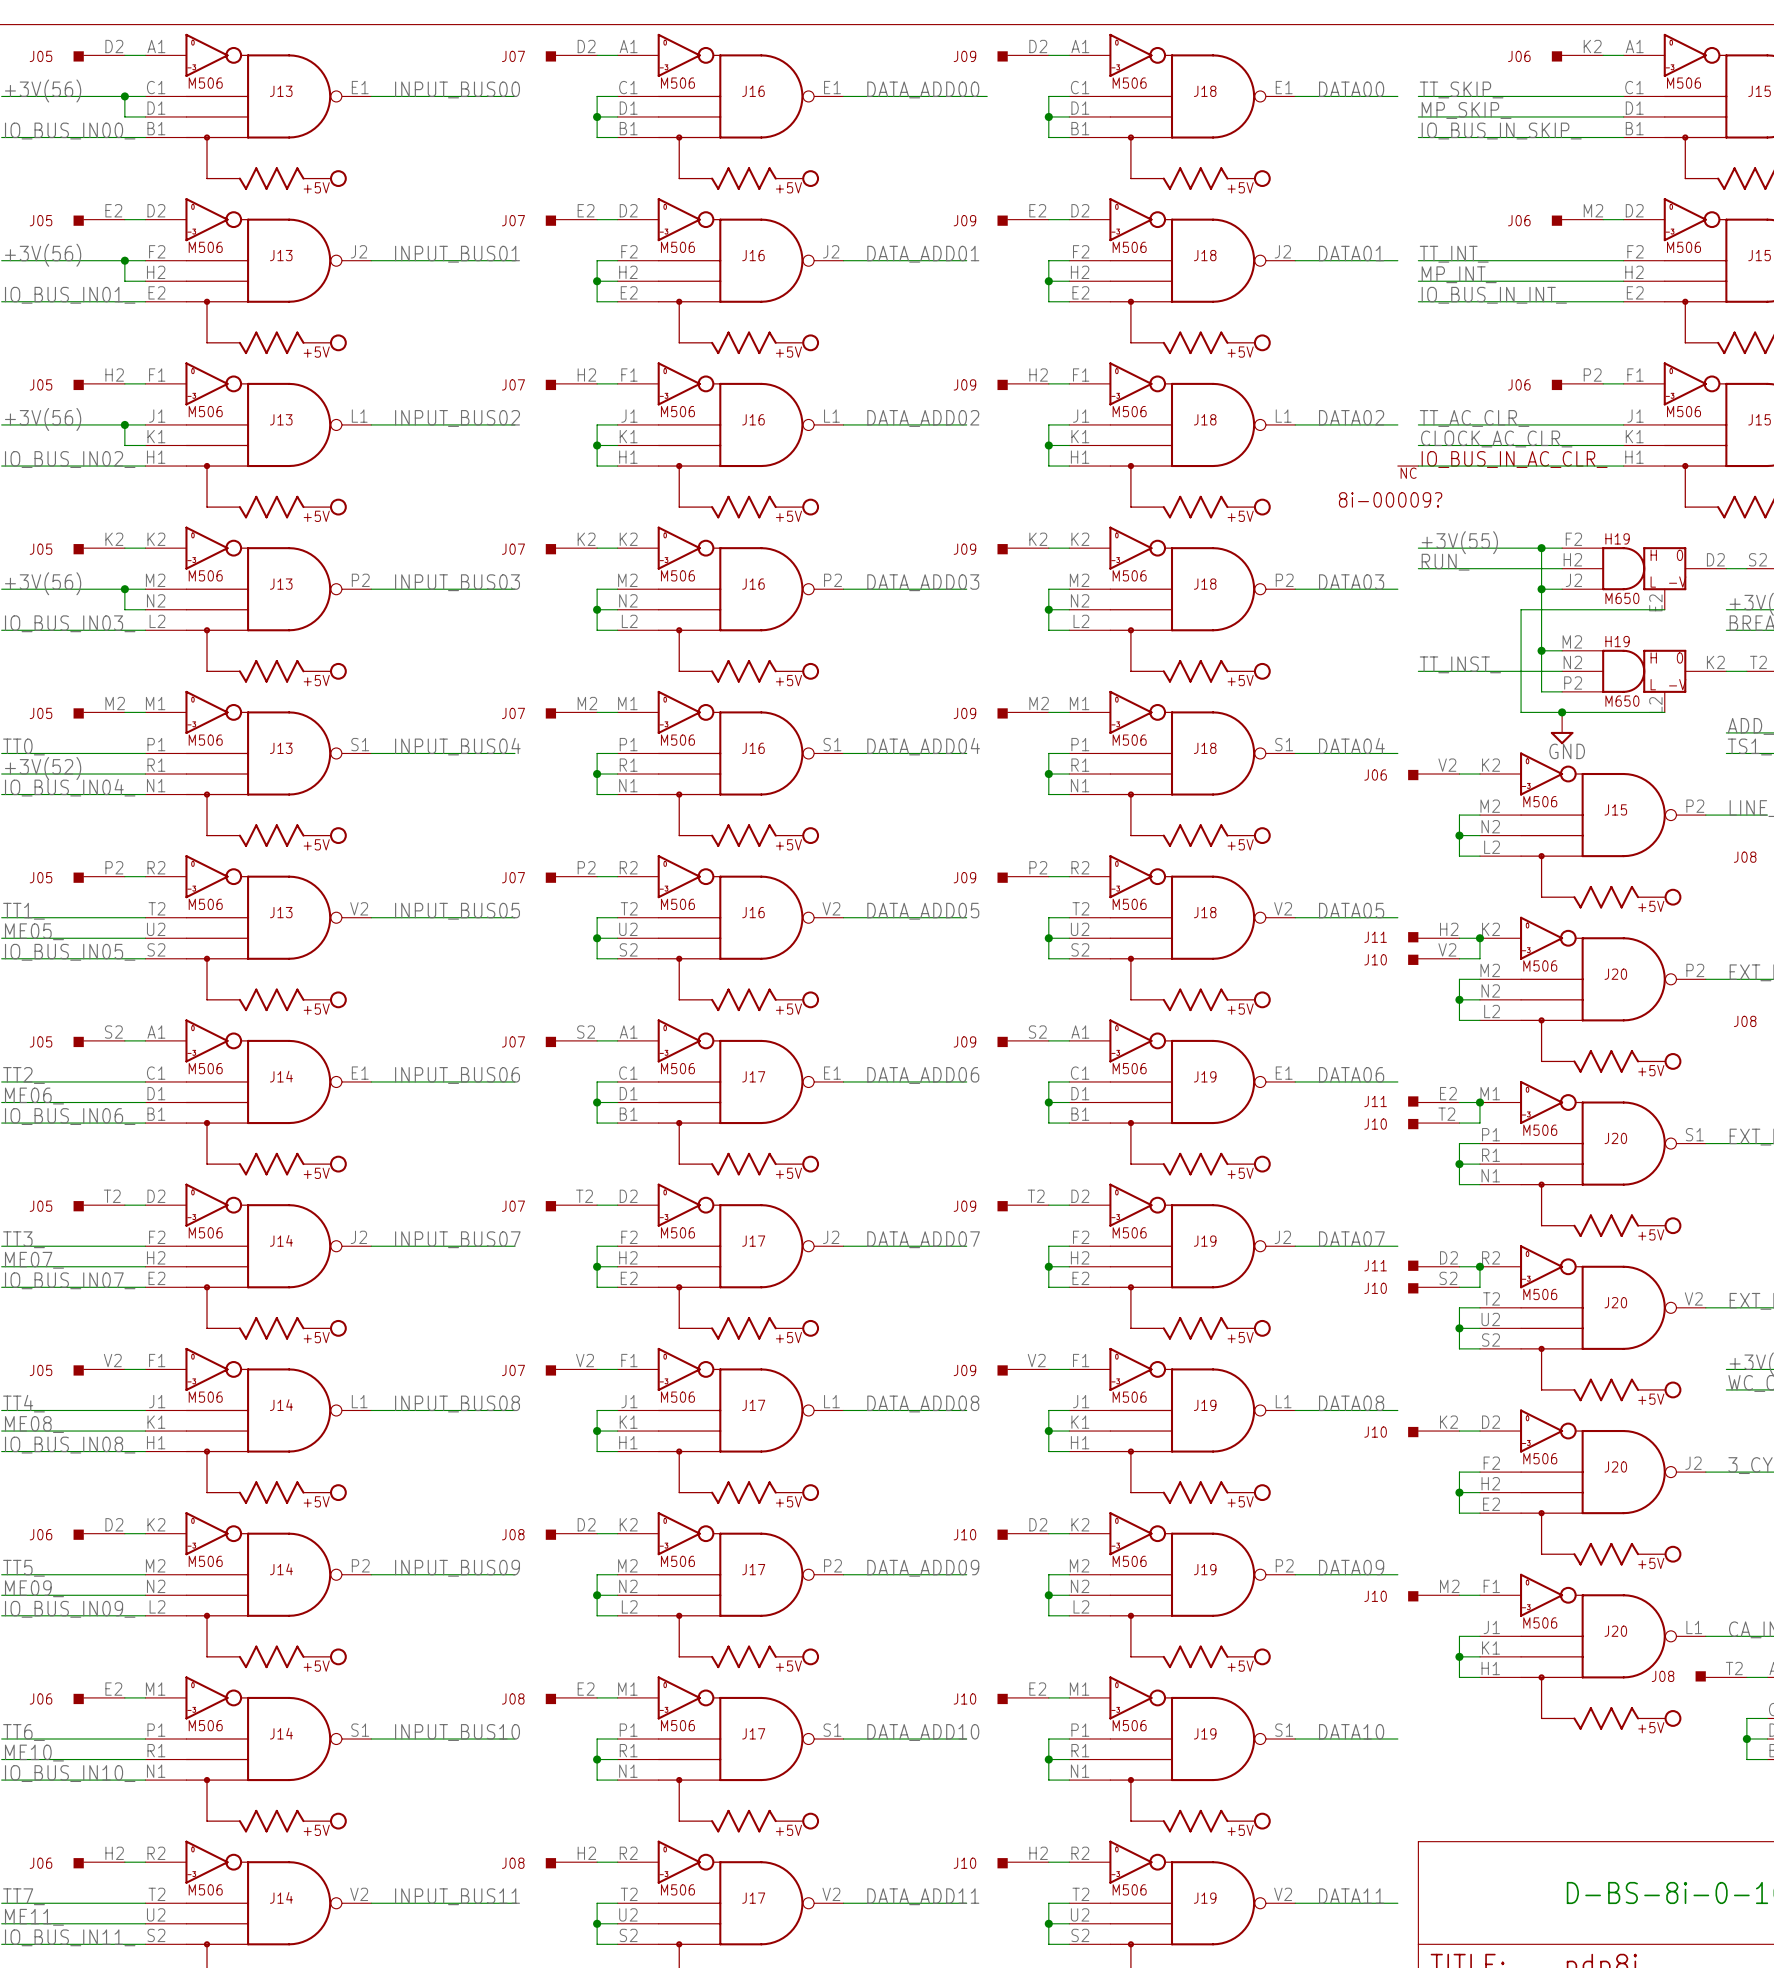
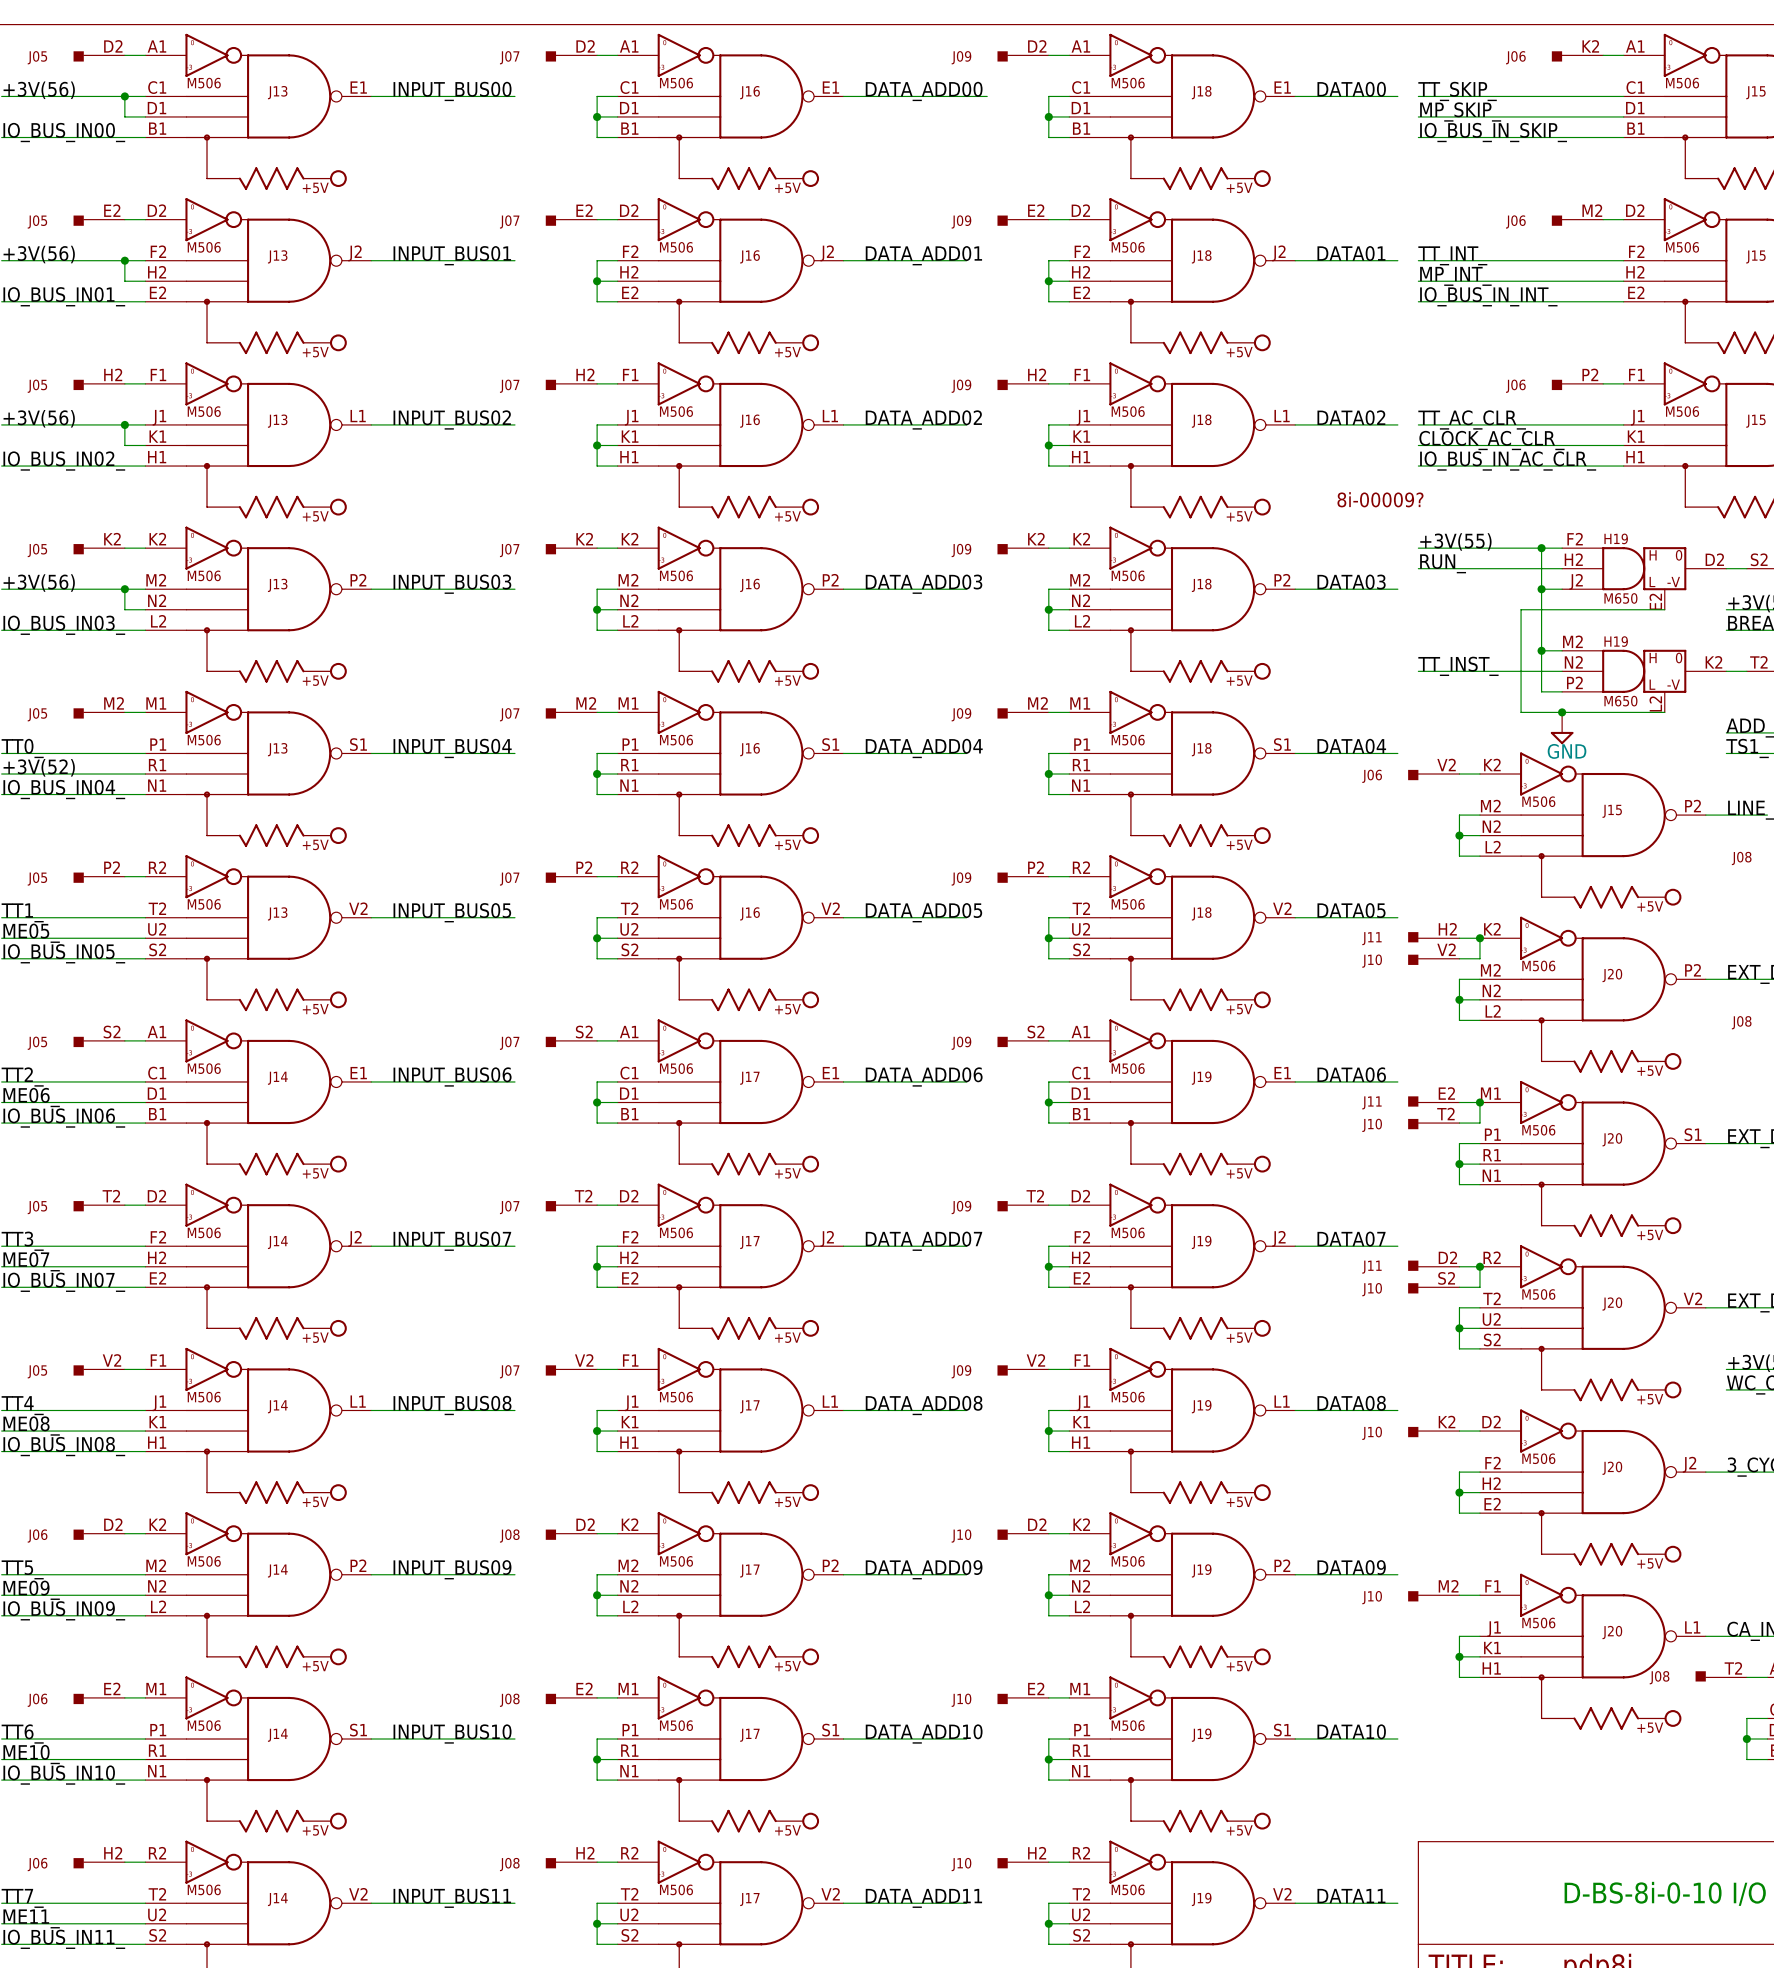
text: IO_BUS_IN_AC_CLR_ (1514, 459) -> none
label: none -> IO_BUS_IN_AC_CLR_ (1508, 461)
power symbol: (1408, 466) -> none

